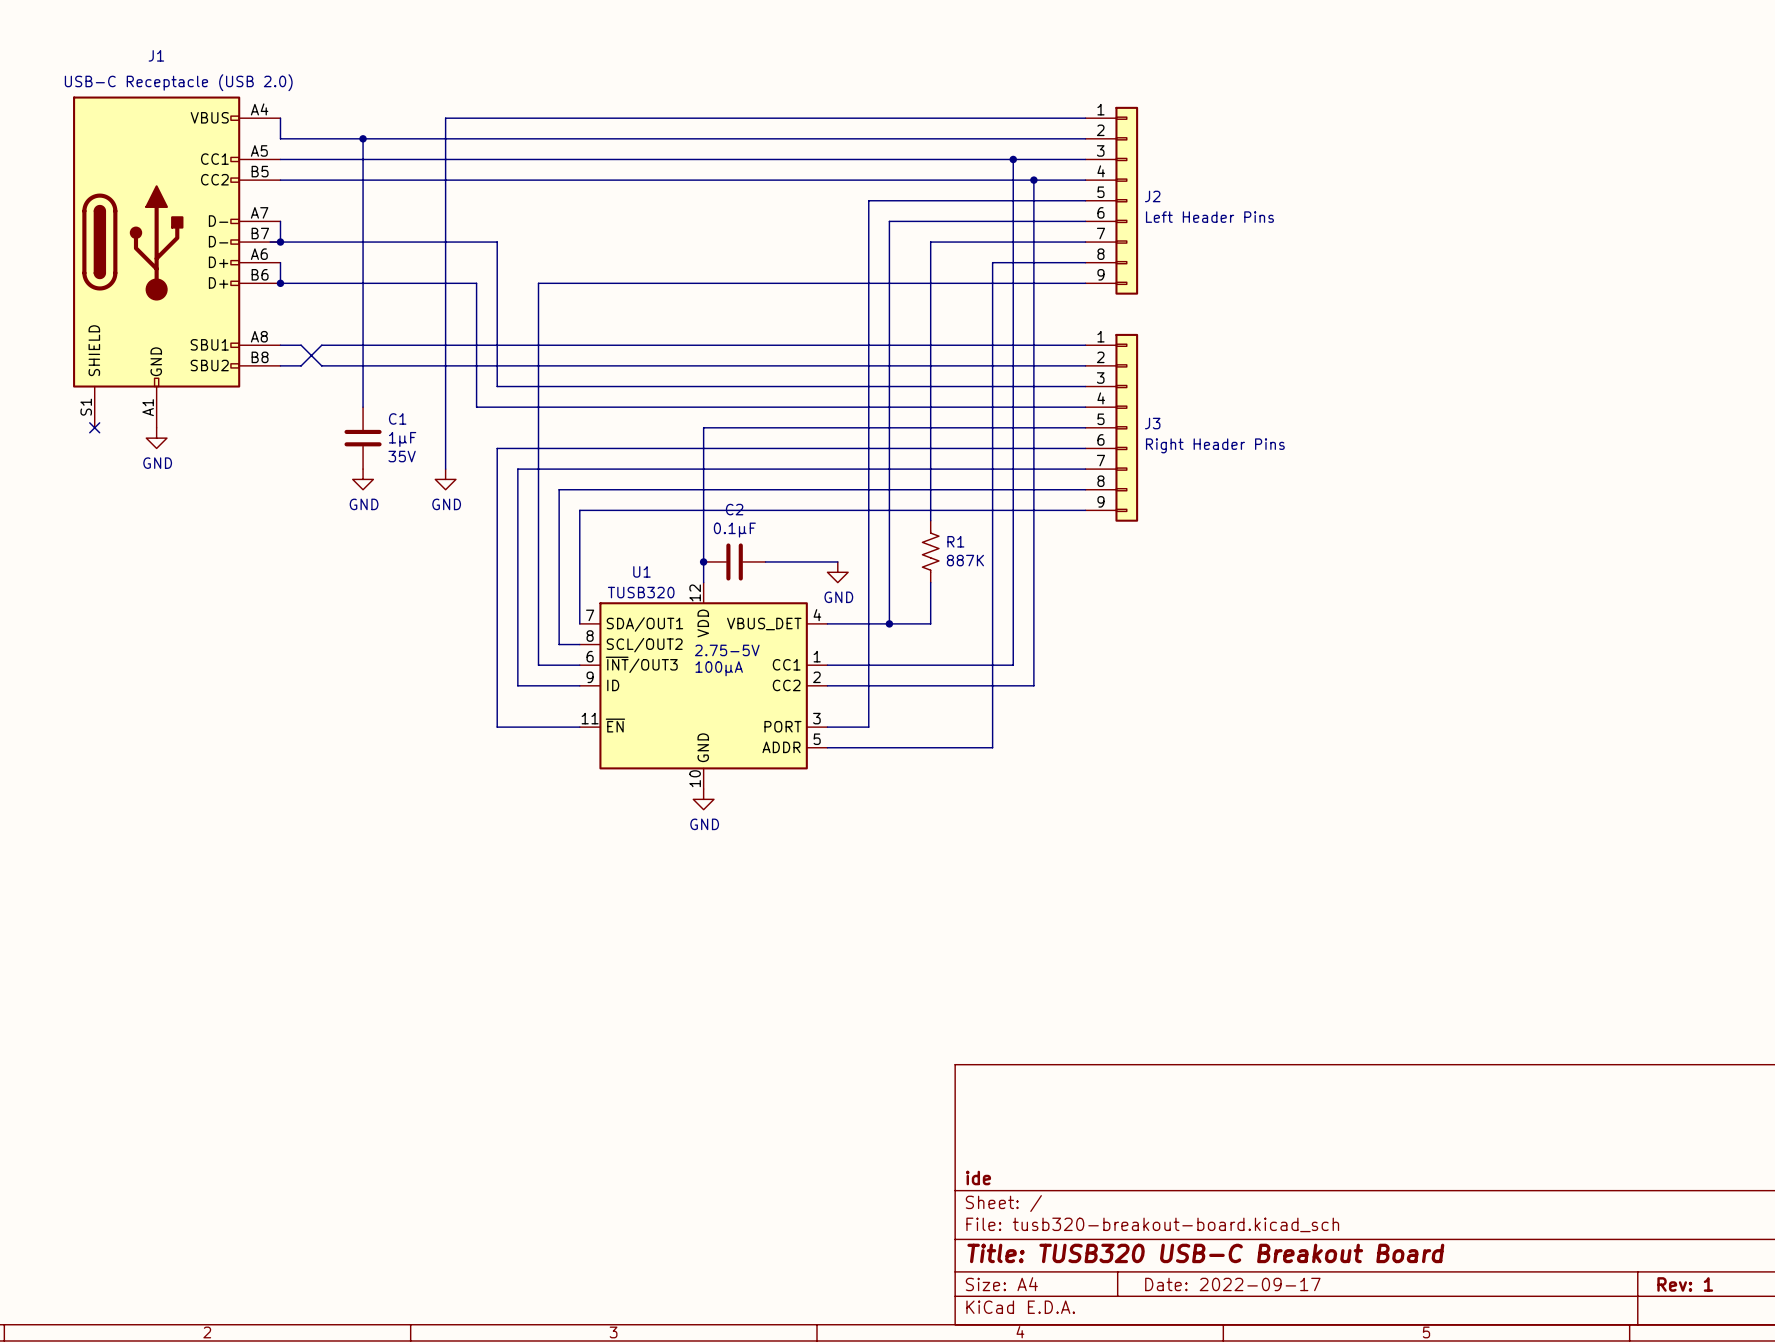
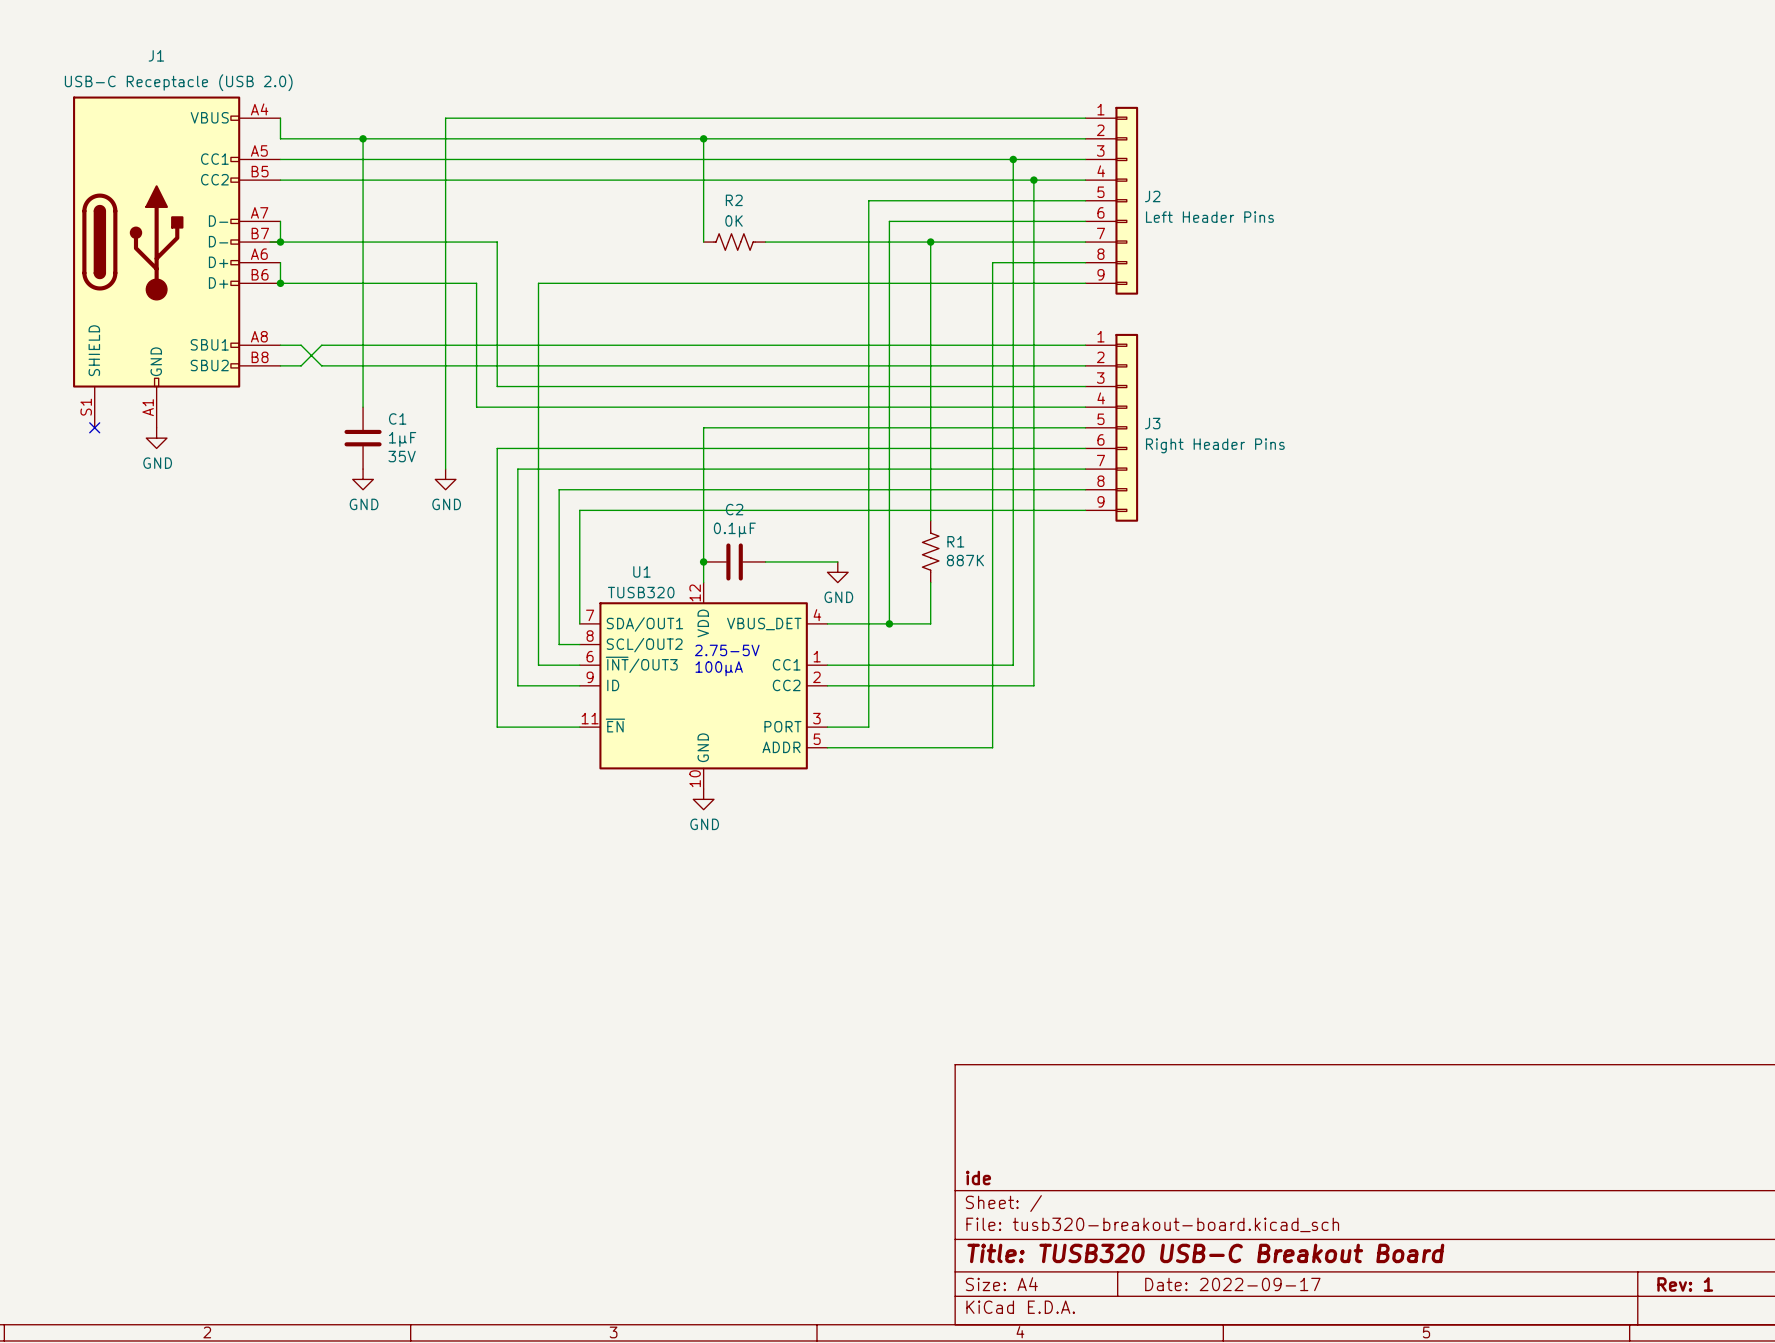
wire: none -> (703, 138) (703, 242)
junction: none -> (703, 138)
R2: none -> 0K (734, 242)
wire: none -> (765, 242) (930, 242)
junction: none -> (930, 242)

